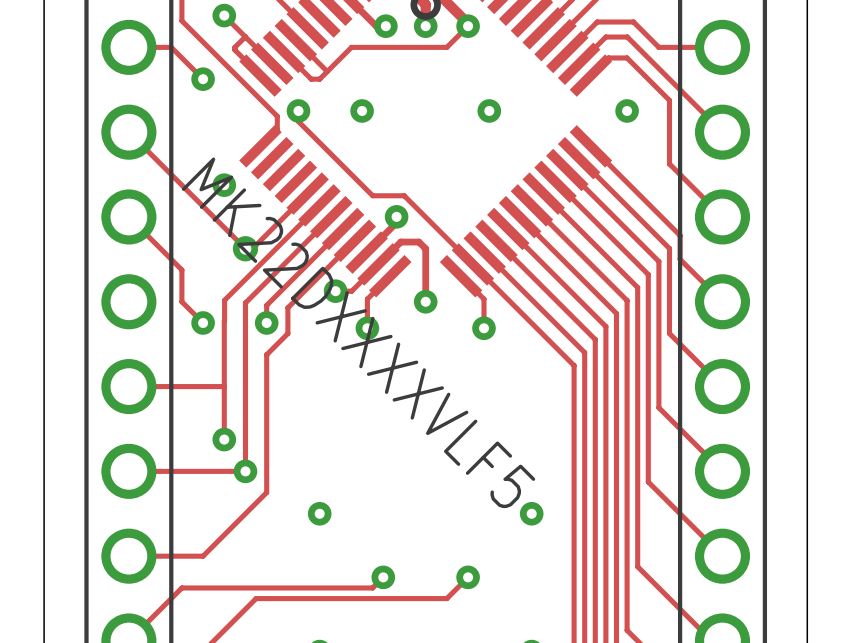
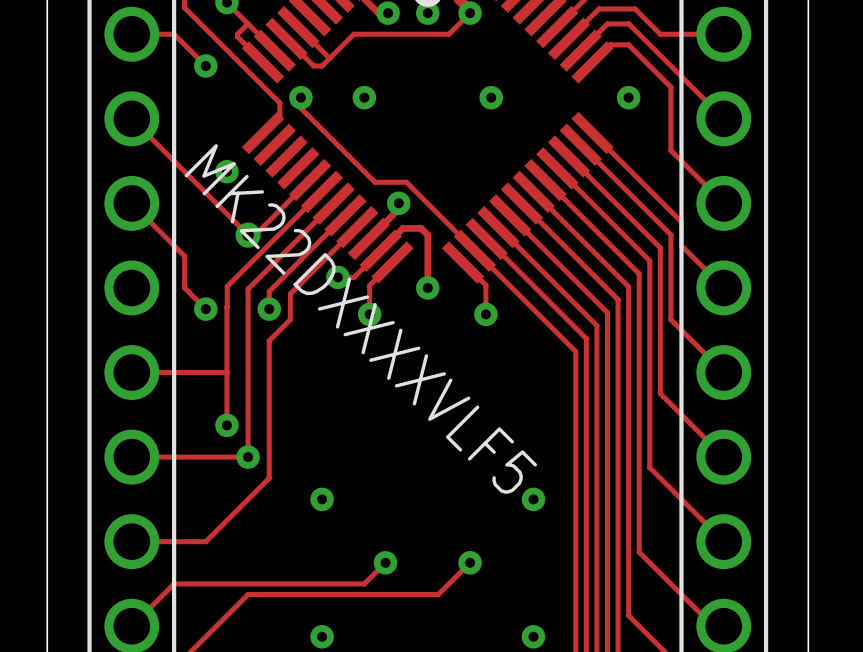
track: (372, 587) (181, 587) (171, 598) -> none
track: (256, 598) (245, 609) -> (258, 583) (174, 583)
track: (362, 598) (446, 598) -> (364, 583) (374, 573)
track: none -> (448, 583) (438, 594) (248, 594)

